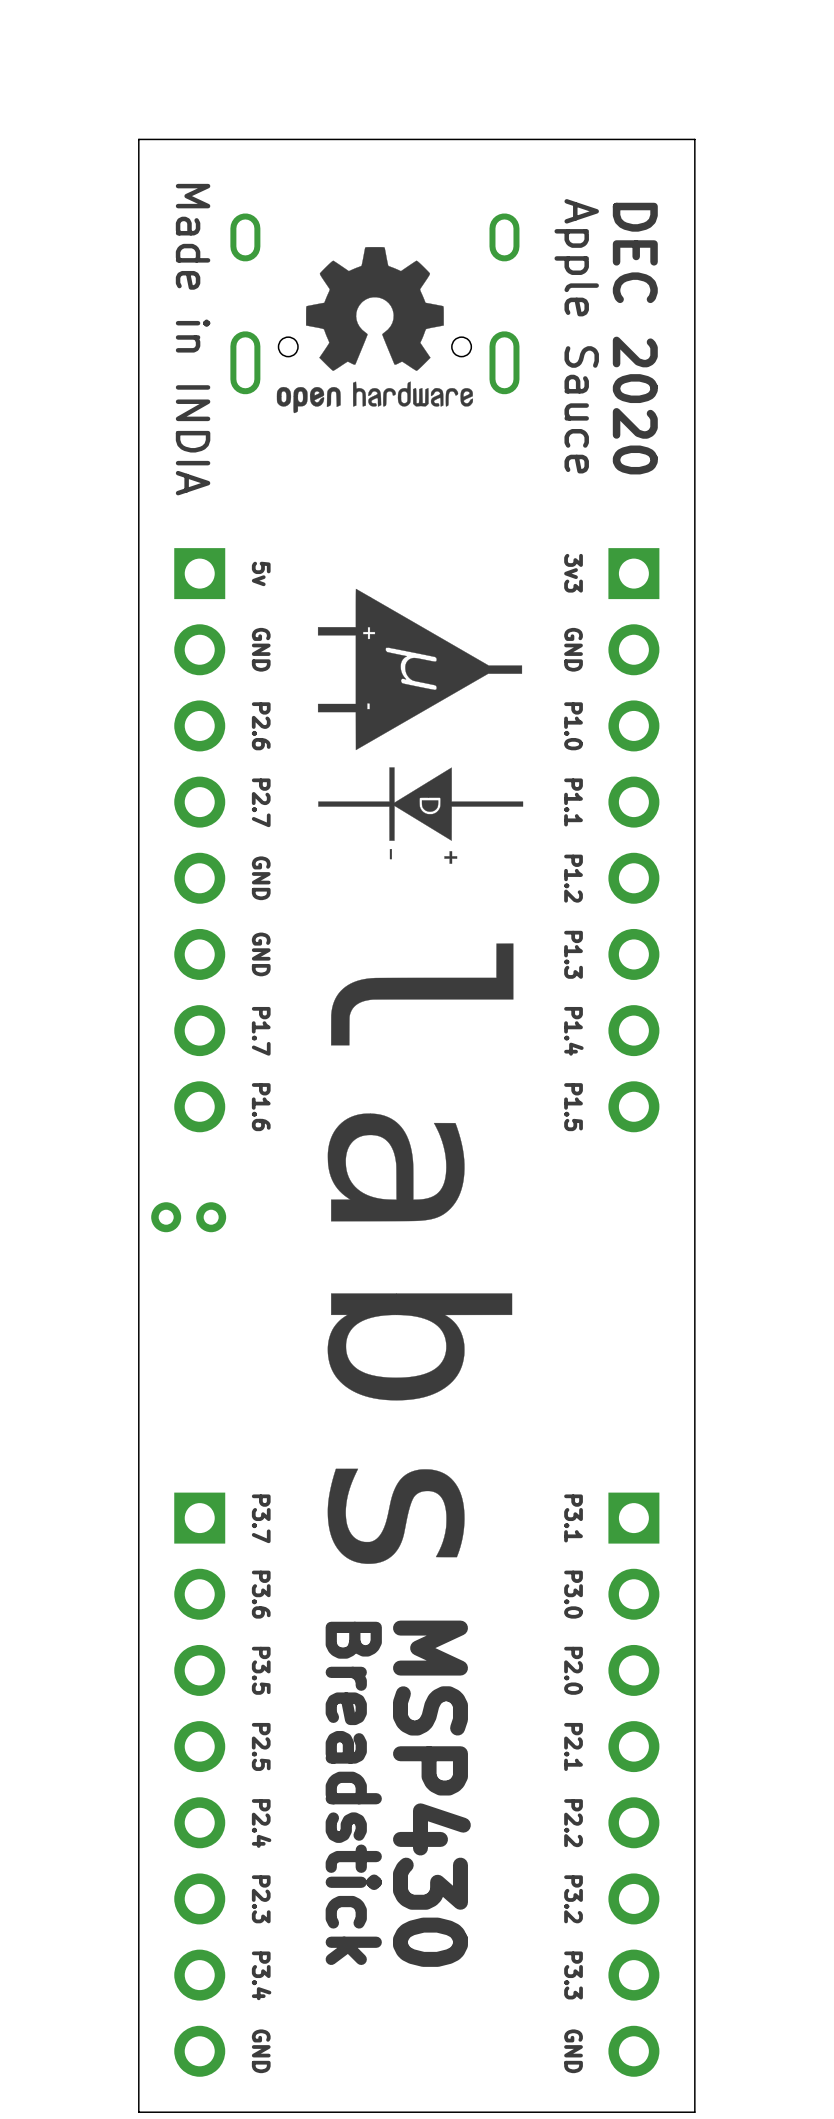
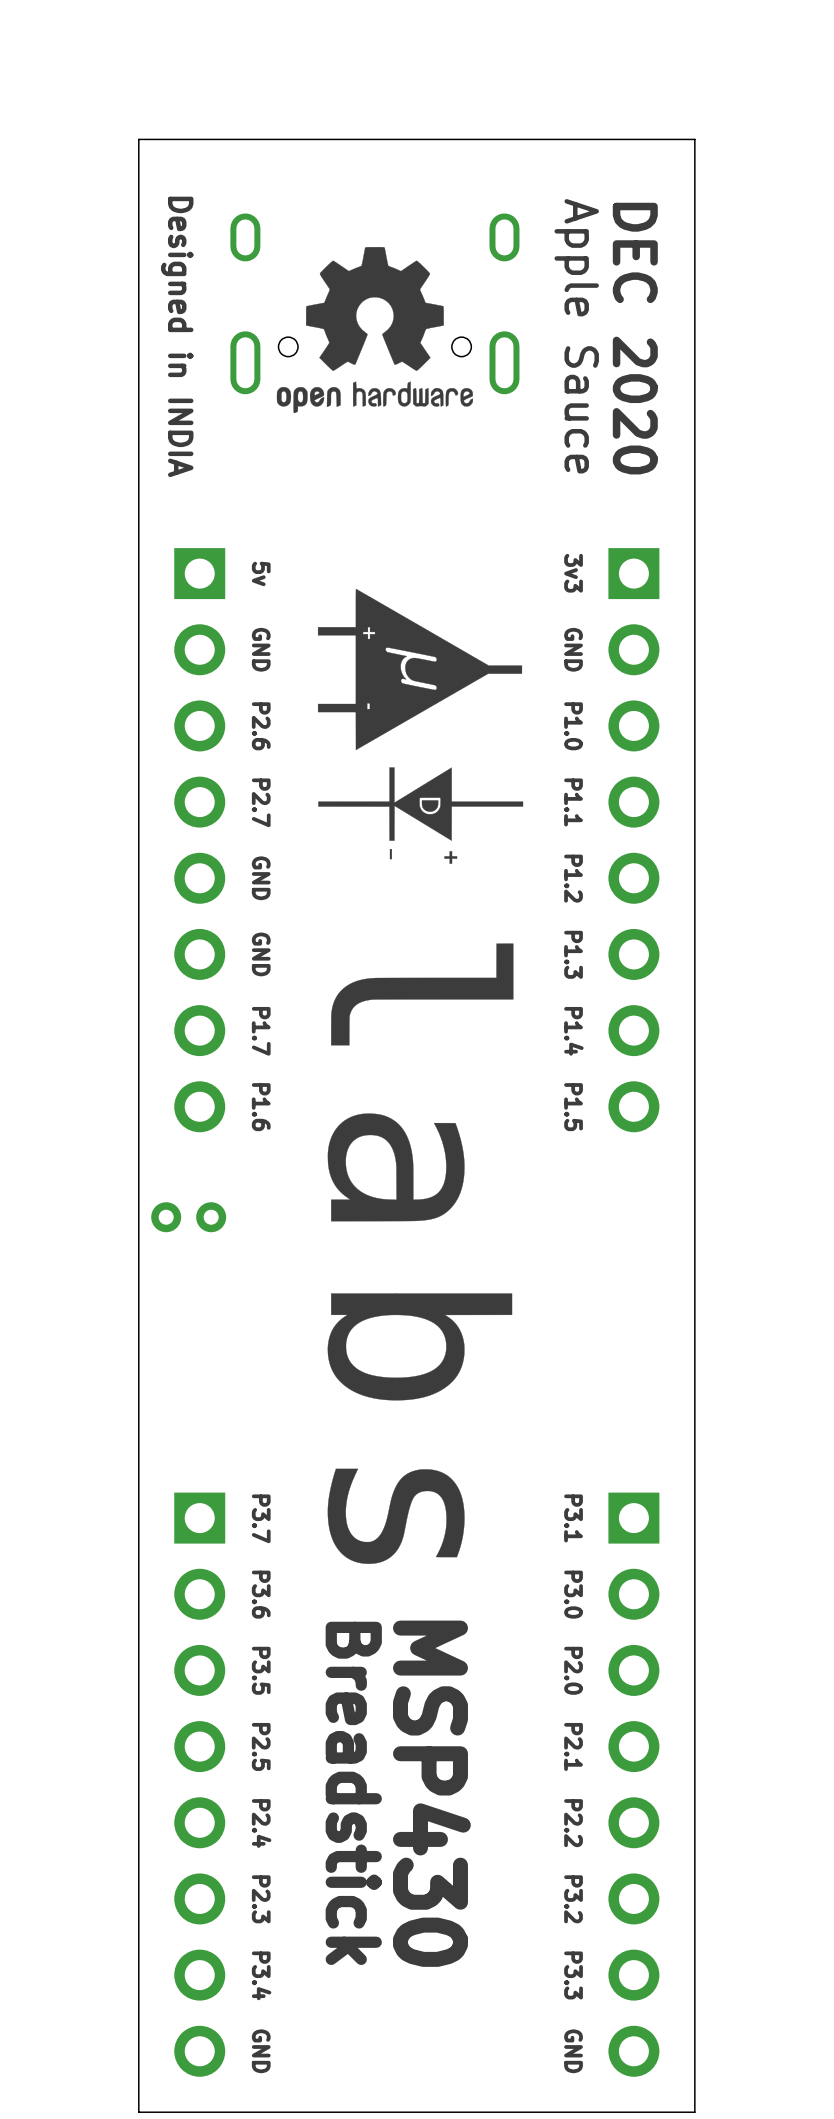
text: Made in INDIA (193, 339) -> Designed in INDIA (177, 336)

